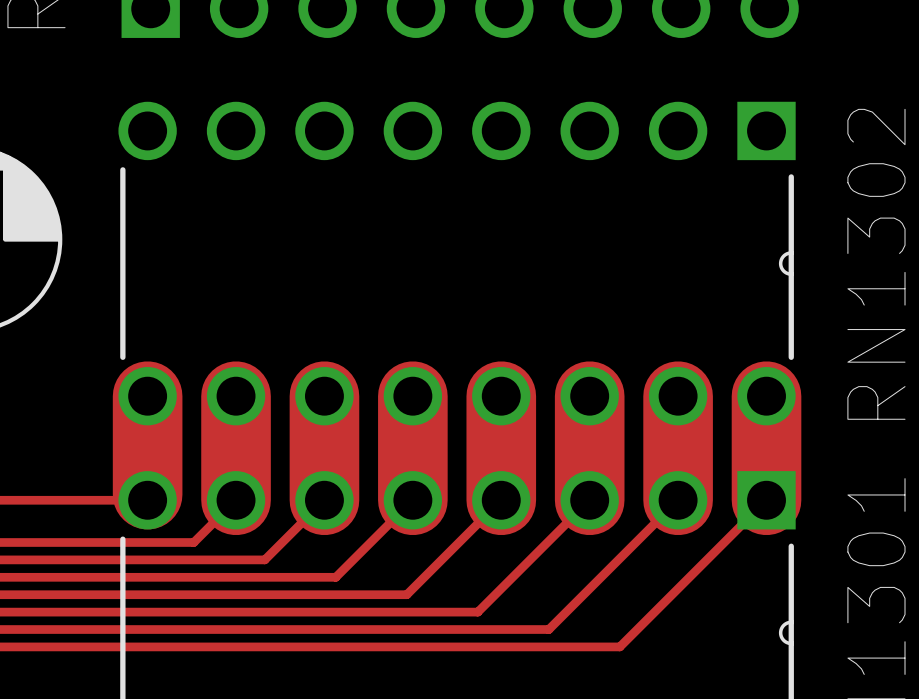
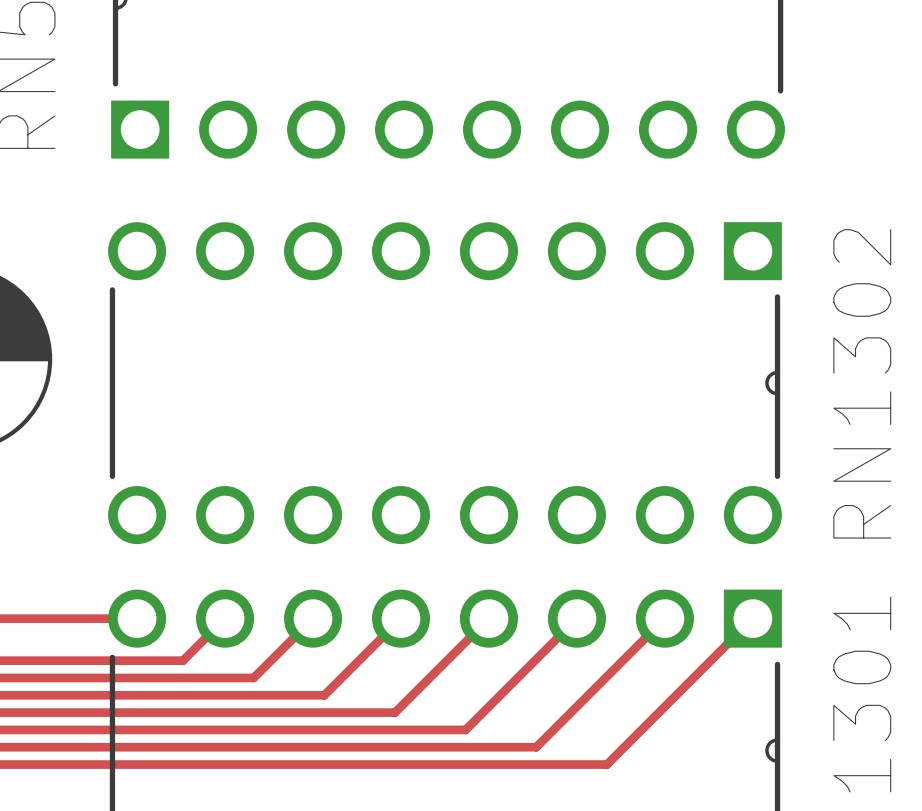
track: (147, 396) (147, 494) -> none
track: (236, 396) (236, 500) -> none
track: (324, 396) (324, 500) -> none
track: (412, 396) (412, 500) -> none
track: (501, 396) (501, 500) -> none
track: (589, 396) (589, 500) -> none
track: (678, 396) (678, 500) -> none
track: (766, 396) (766, 500) -> none

